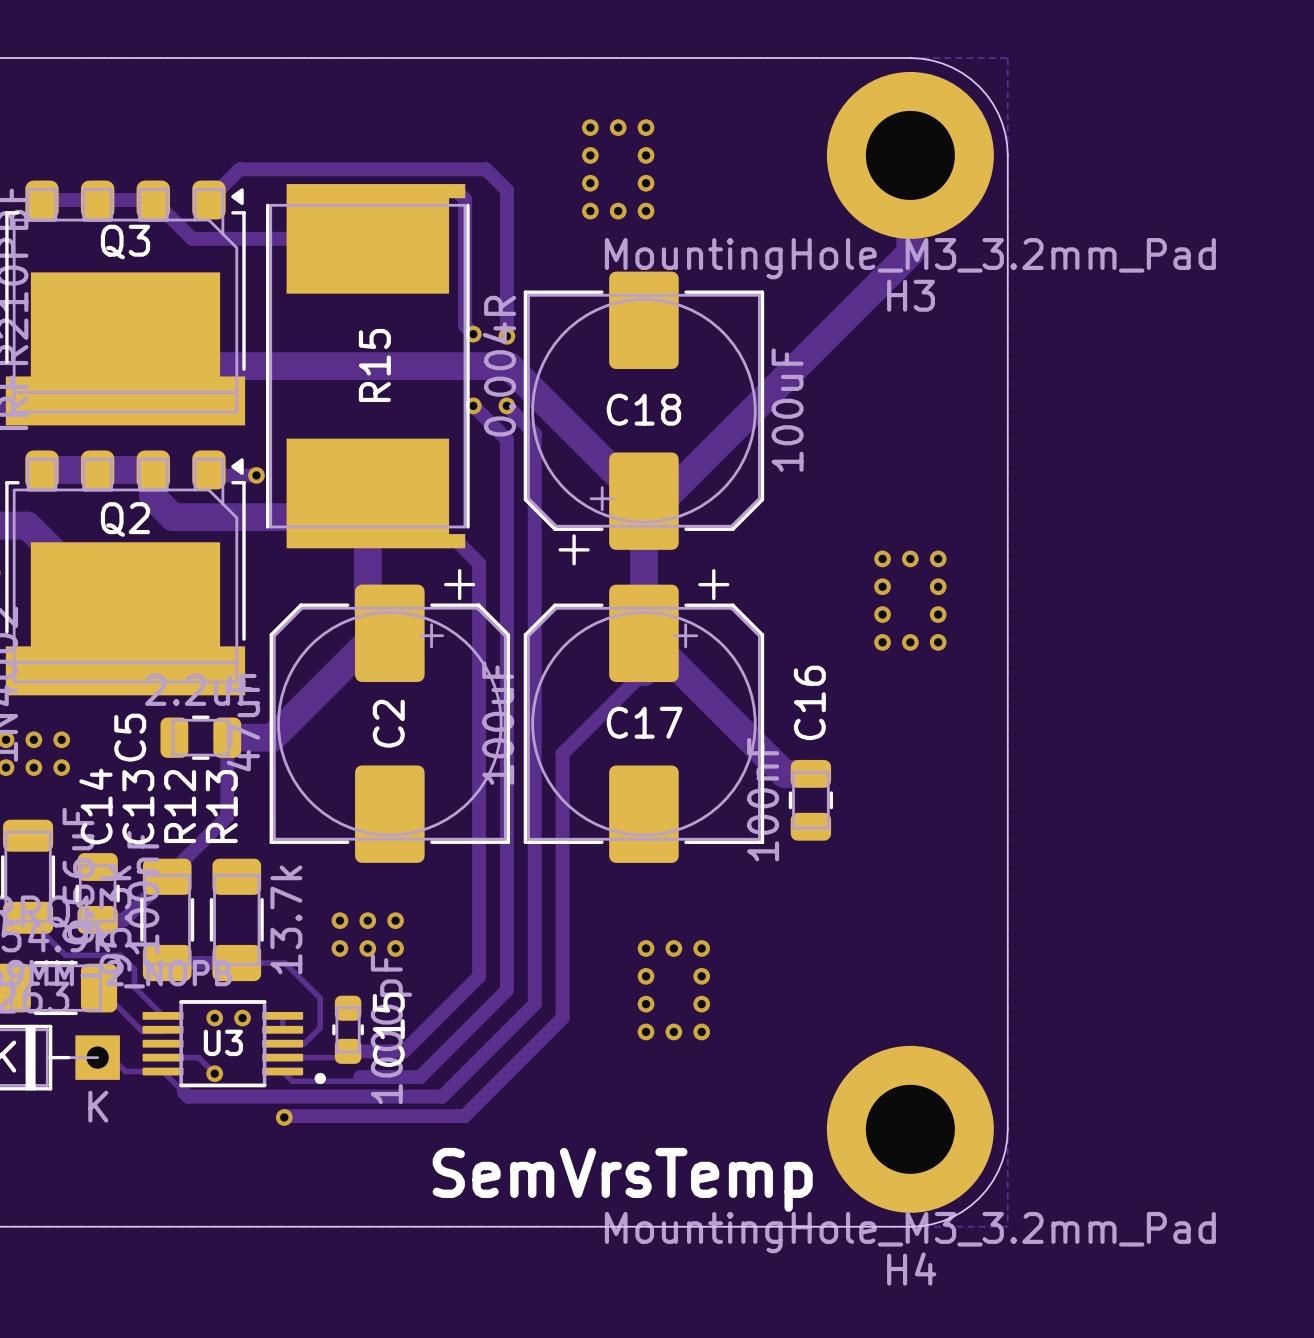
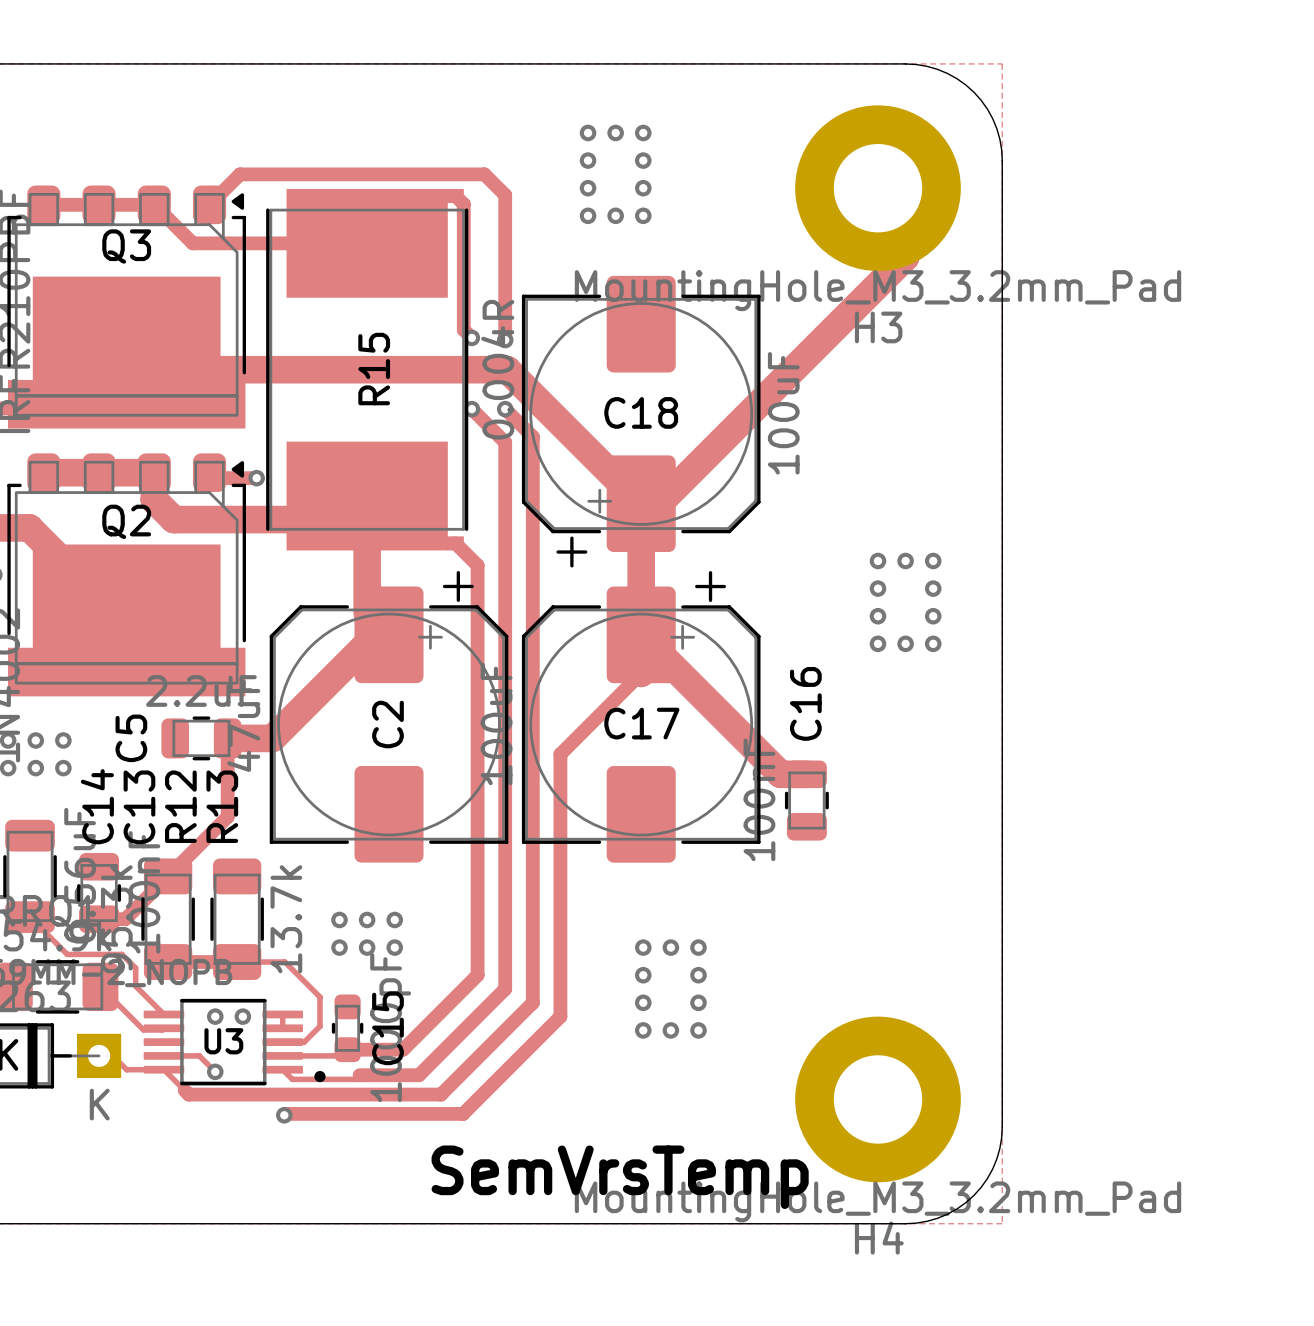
H3 position: (910, 155) -> (878, 188)
H4 position: (910, 1129) -> (878, 1099)

